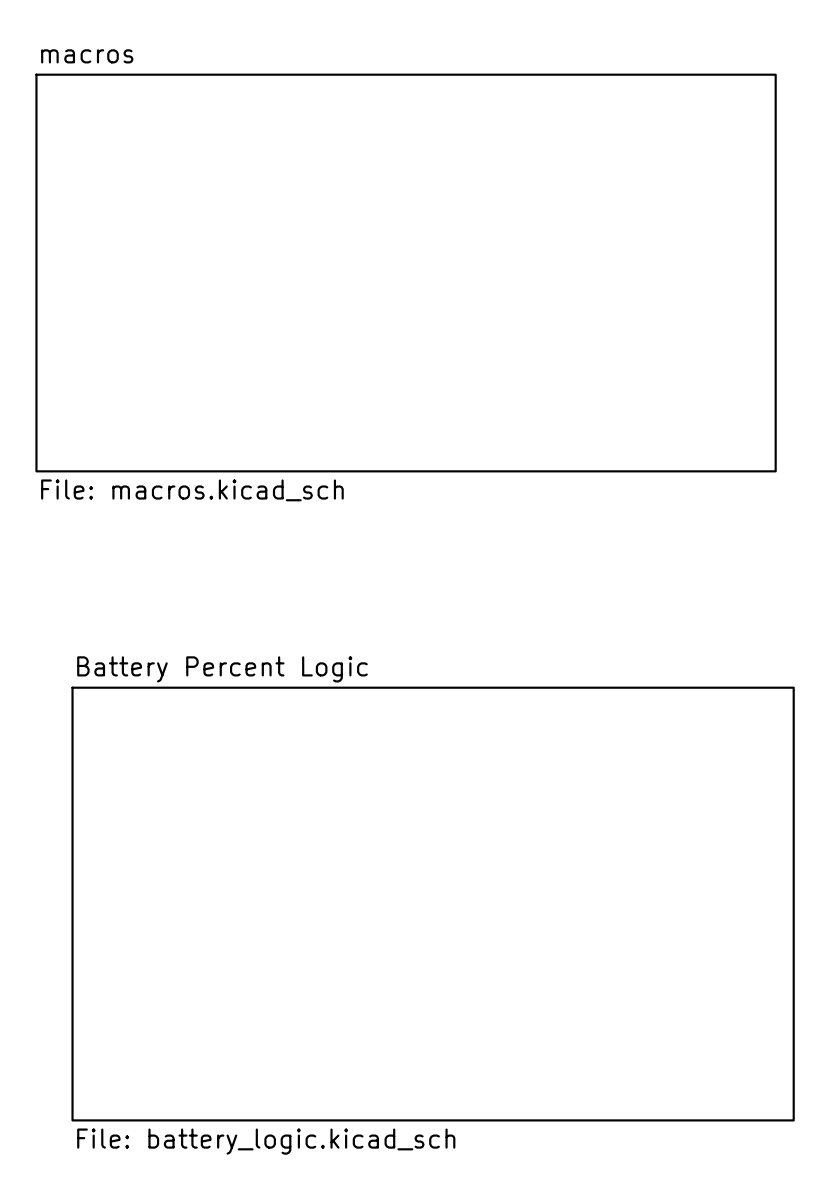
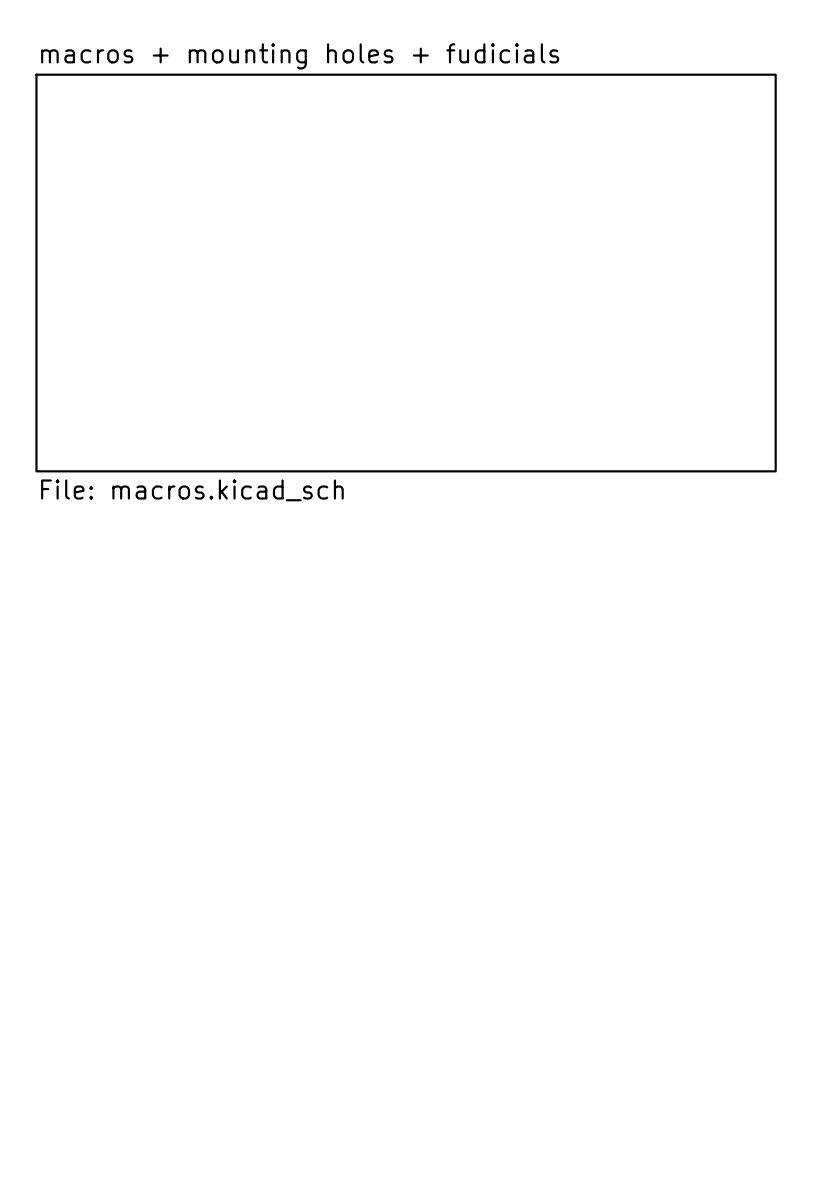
sheet macros name: macros (87, 56) -> macros + mounting holes + fudicials (300, 56)
sheet Battery Percent Logic: File: battery_logic.kicad_sch (433, 904) -> none

